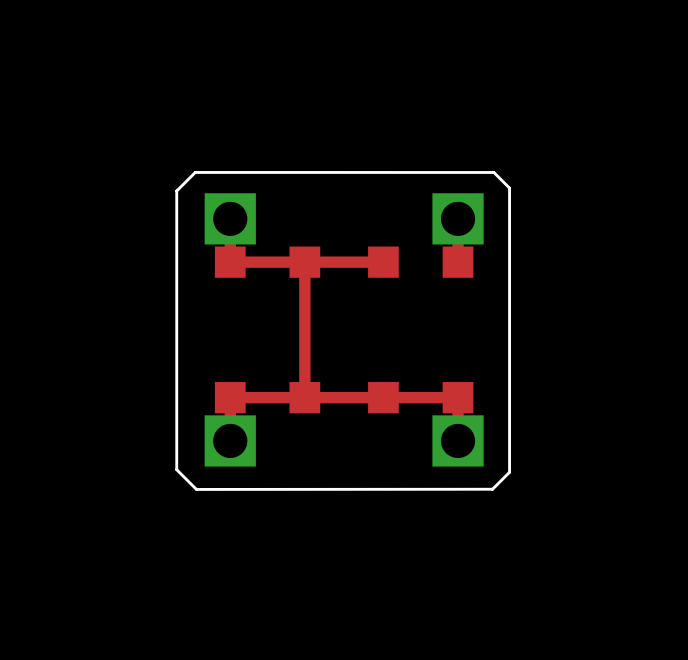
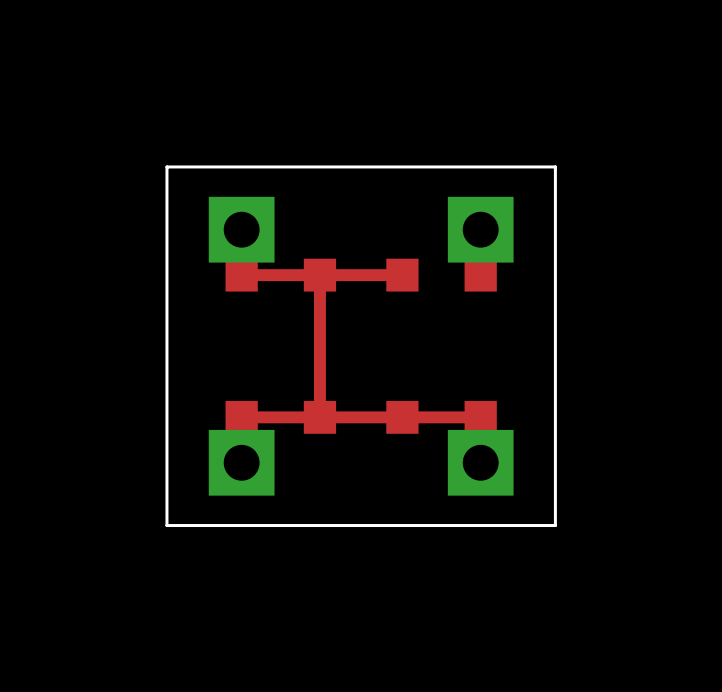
board edge: (195, 172) (176, 190) (176, 469) (196, 489) (492, 489) (509, 472) (509, 188) (493, 172) (195, 172) -> (166, 166) (166, 525) (555, 525) (555, 166) (166, 166)
part footprint: [204, 193, 256, 245] -> [208, 196, 275, 263]
part footprint: [432, 193, 484, 245] -> [447, 196, 514, 263]
part footprint: [204, 415, 256, 467] -> [208, 429, 275, 496]
part footprint: [432, 415, 484, 467] -> [447, 429, 514, 496]

